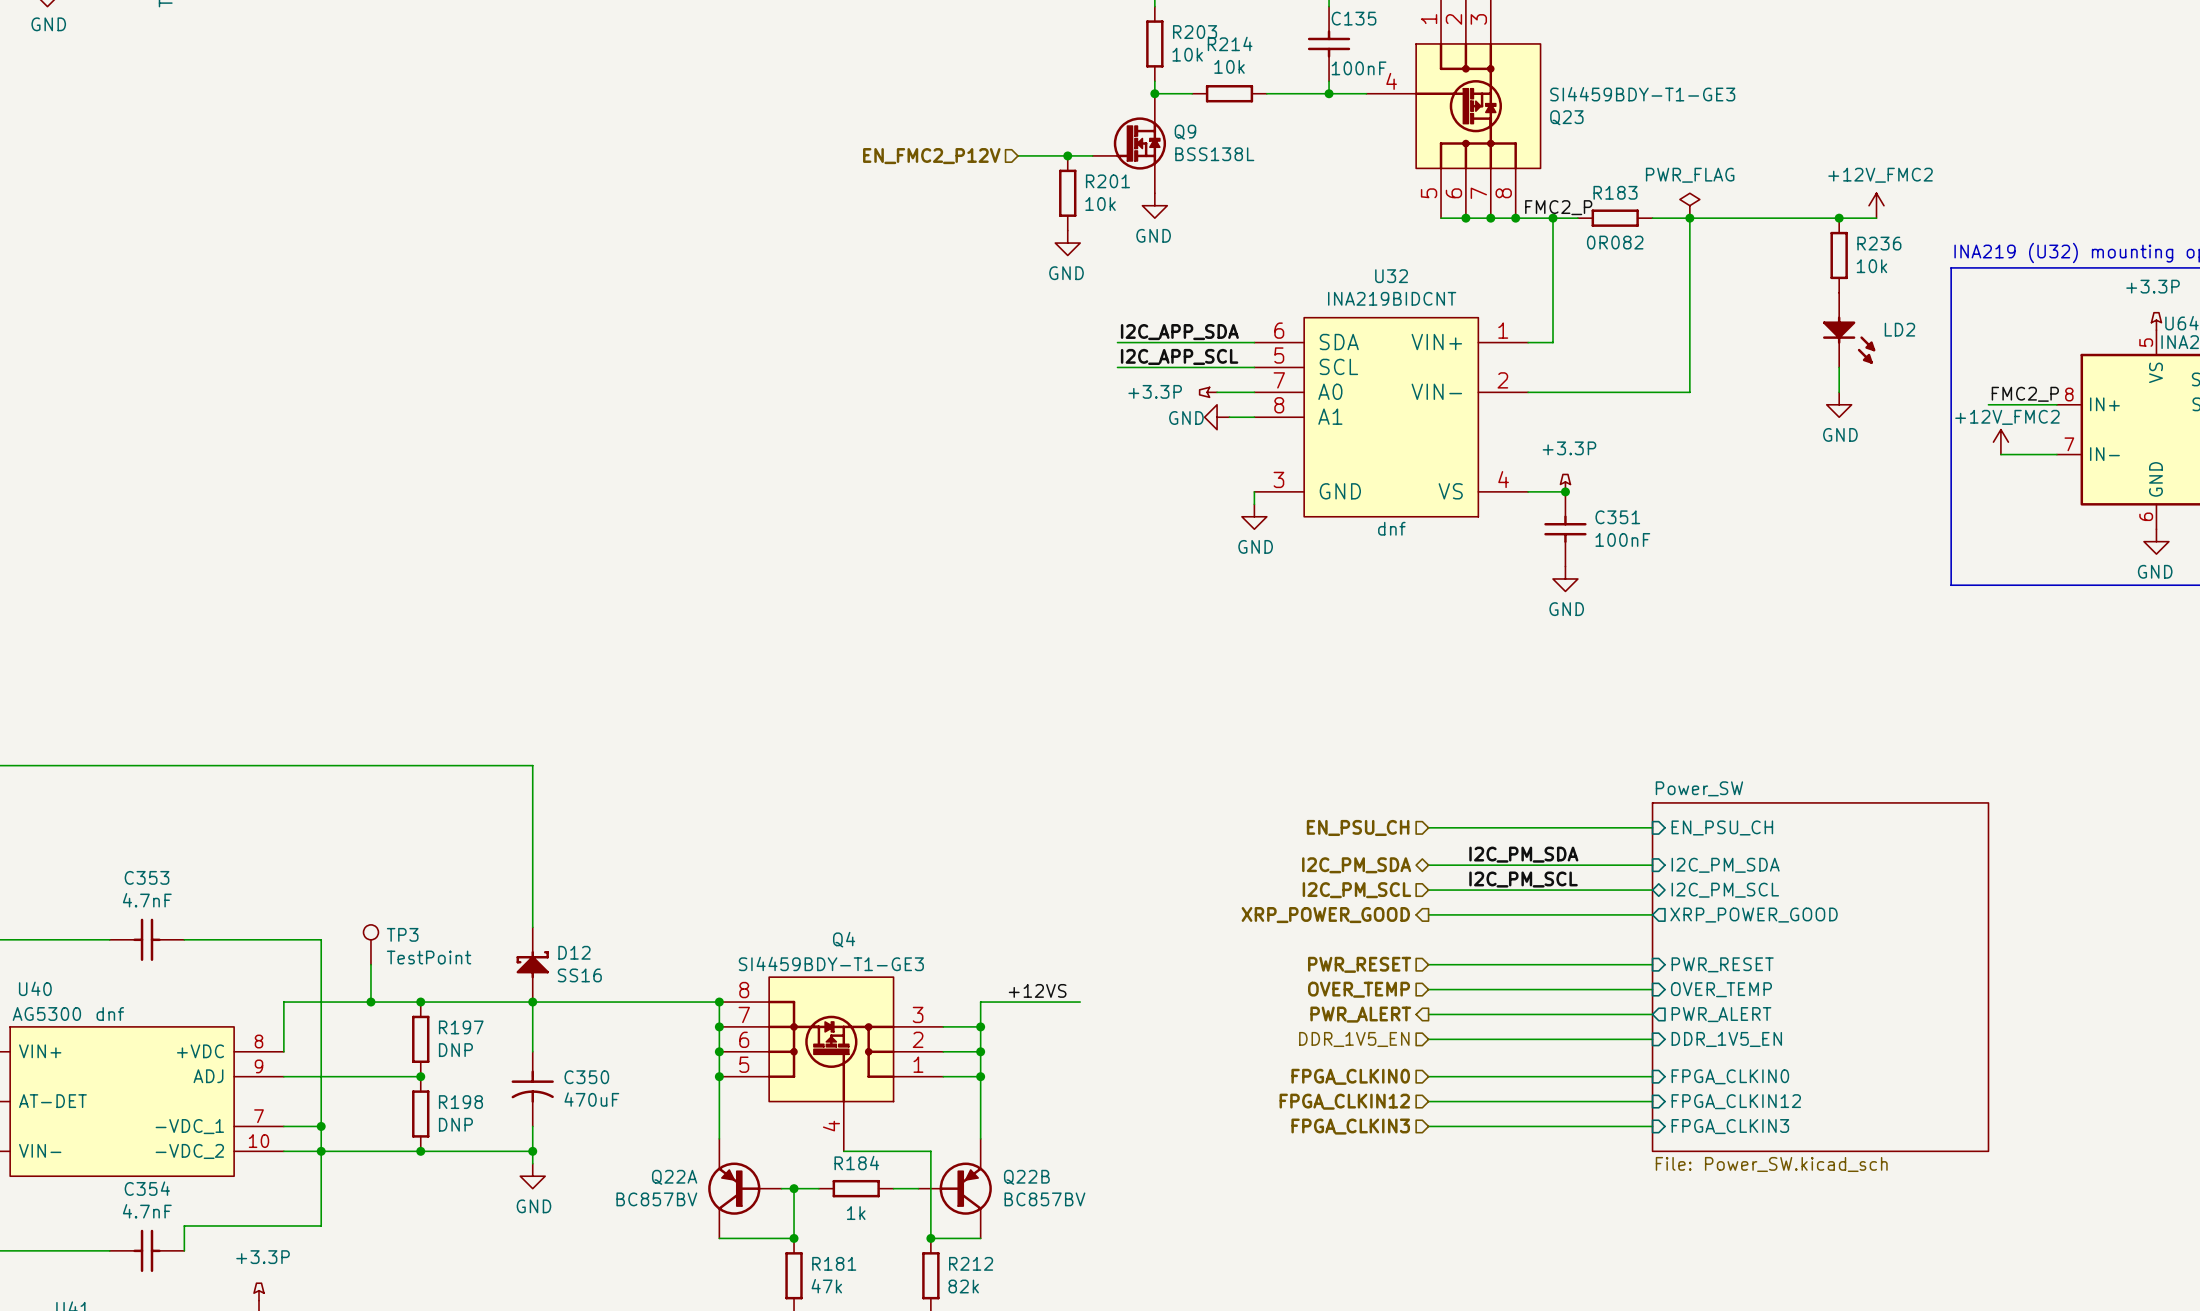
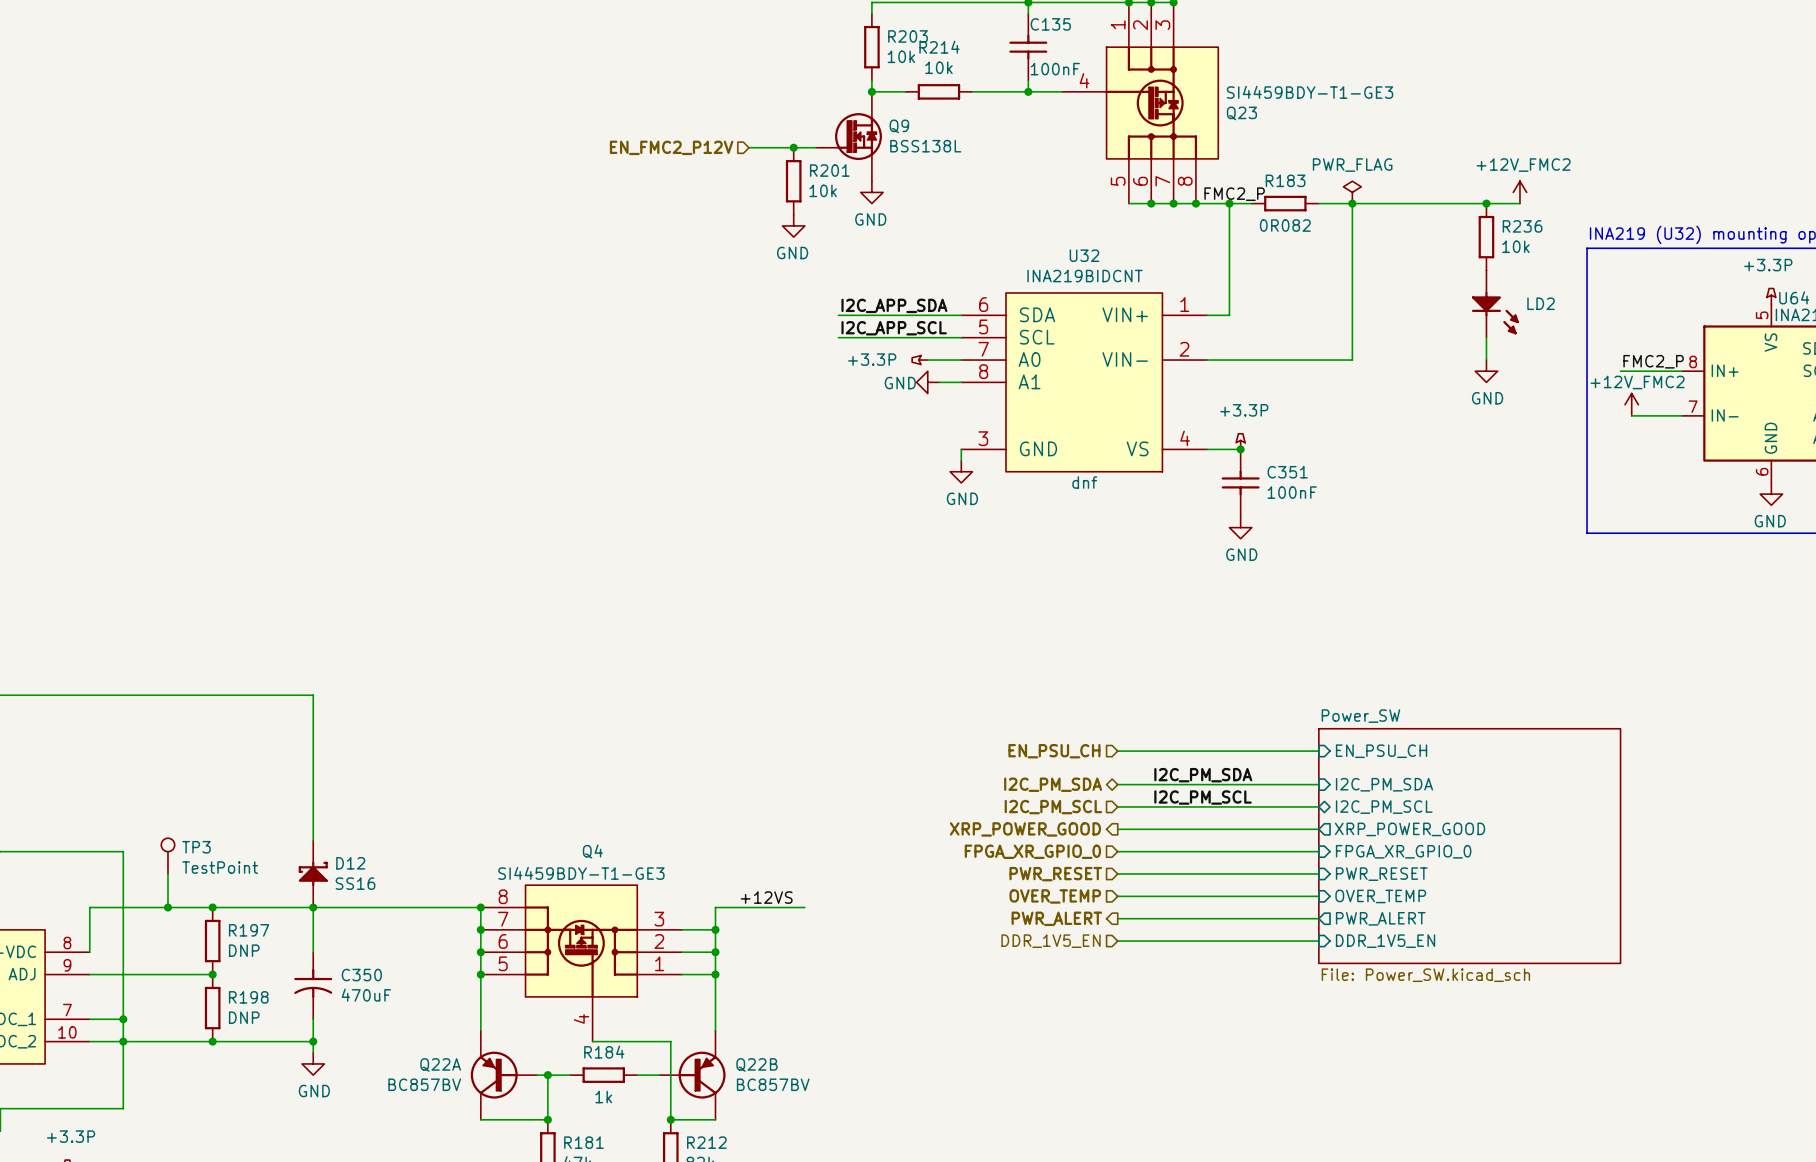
sheet Power_SW: none -> File: Power_SW.kicad_sch (1469, 846)
hierarchical label: none -> FPGA_XR_GPIO_0 (1032, 851)
sheet pin: none -> FPGA_XR_GPIO_0 (1403, 851)
sheet Power_SW: File: Power_SW.kicad_sch (1820, 977) -> none
hierarchical label: FPGA_CLKIN0 (1350, 1076) -> none
wire: (1428, 1076) (1652, 1076) -> (1117, 851) (1318, 851)
sheet pin: FPGA_CLKIN0 (1730, 1076) -> none
hierarchical label: FPGA_CLKIN12 (1344, 1101) -> none
wire: (1428, 1101) (1652, 1101) -> none
sheet pin: FPGA_CLKIN12 (1736, 1101) -> none
hierarchical label: FPGA_CLKIN3 (1350, 1126) -> none
wire: (1428, 1126) (1652, 1126) -> none
sheet pin: FPGA_CLKIN3 (1730, 1126) -> none

